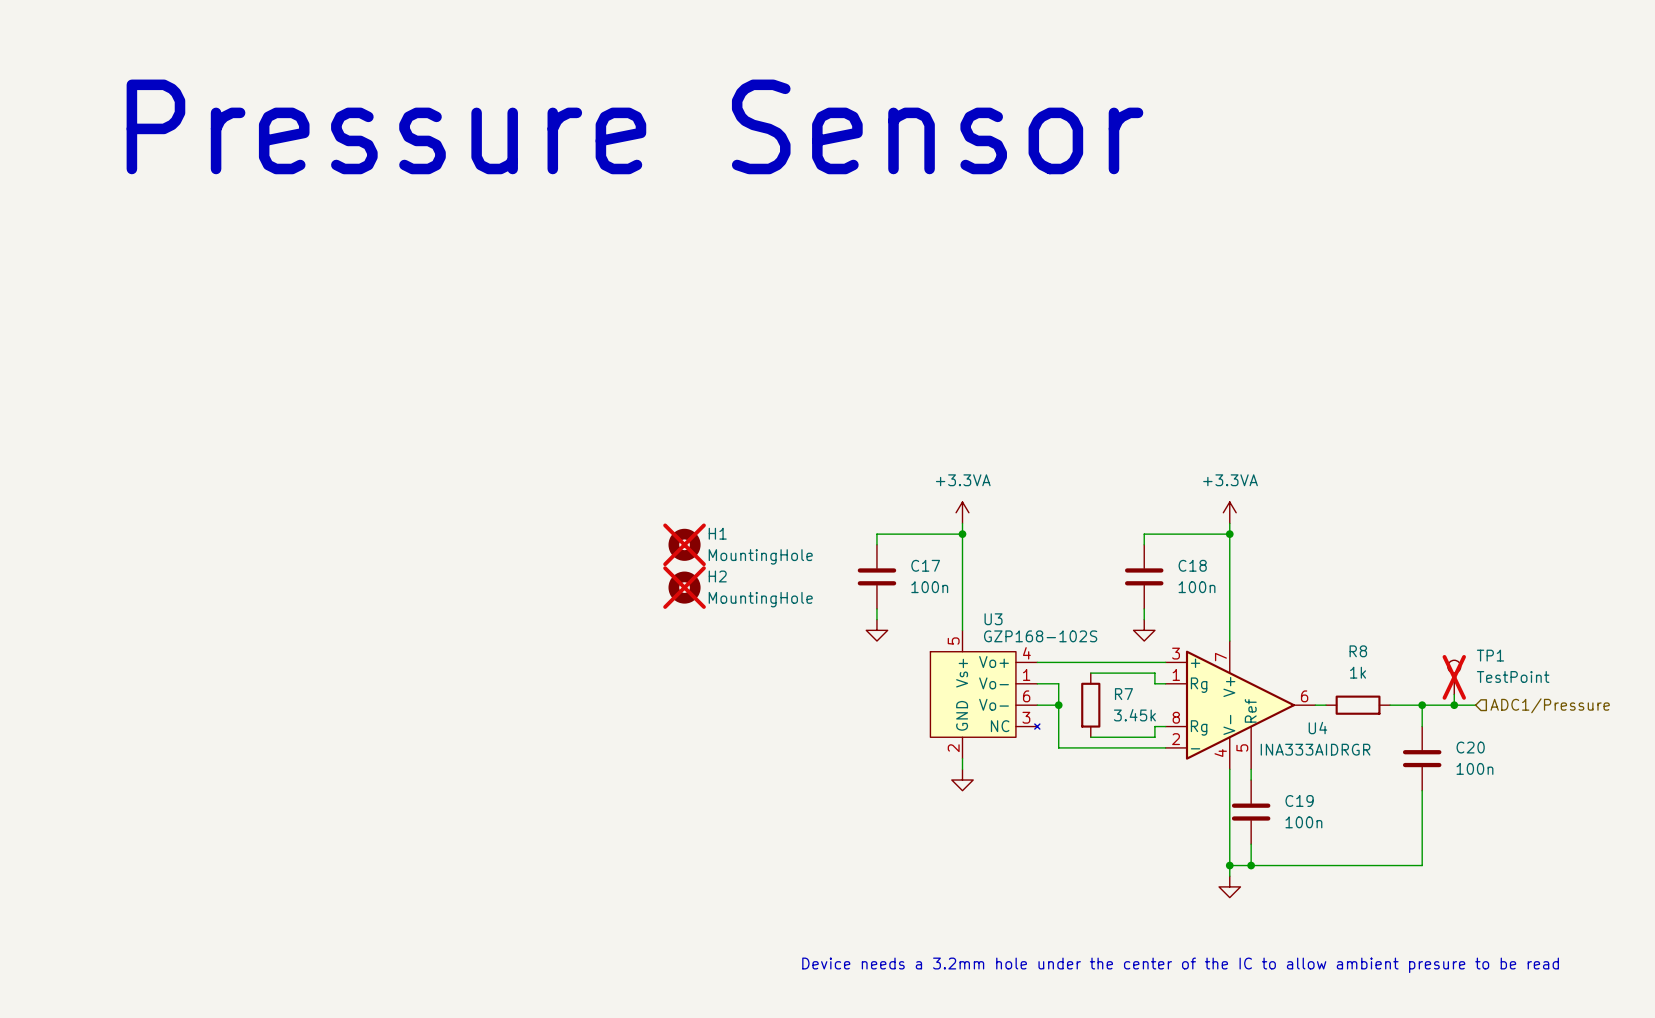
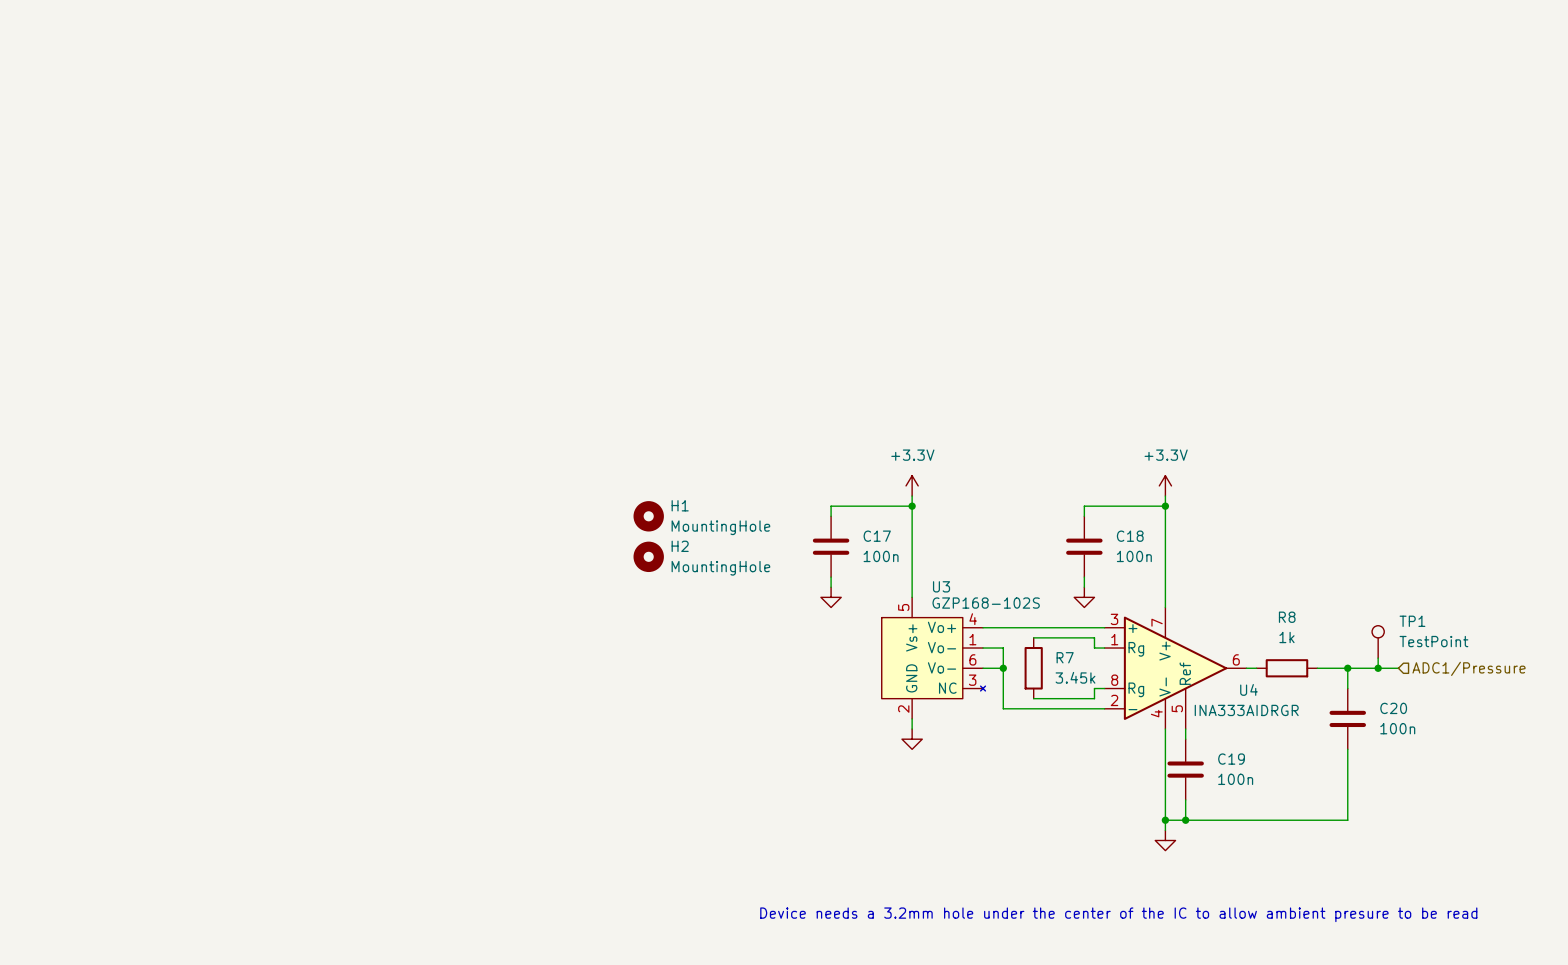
text: Pressure Sensor (634, 126) -> none
power symbol: +3.3VA (962, 512) -> +3.3V (912, 485)
power symbol: +3.3VA (1229, 512) -> +3.3V (1165, 485)
H1 do-not-place cross: (684, 544) -> none
H2 do-not-place cross: (684, 587) -> none
TP1 do-not-place cross: (1454, 677) -> none

